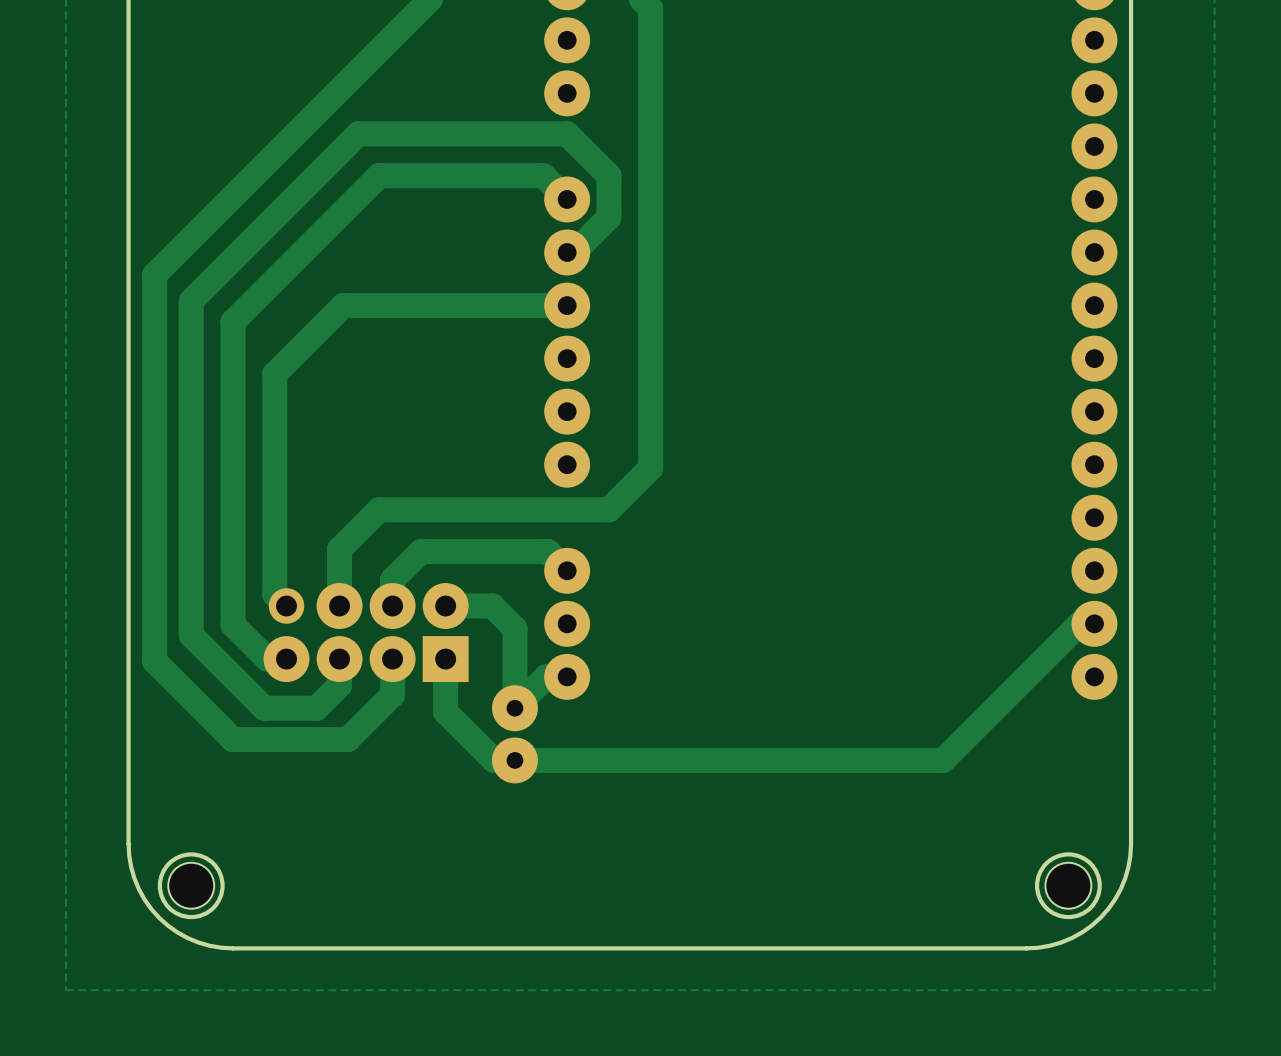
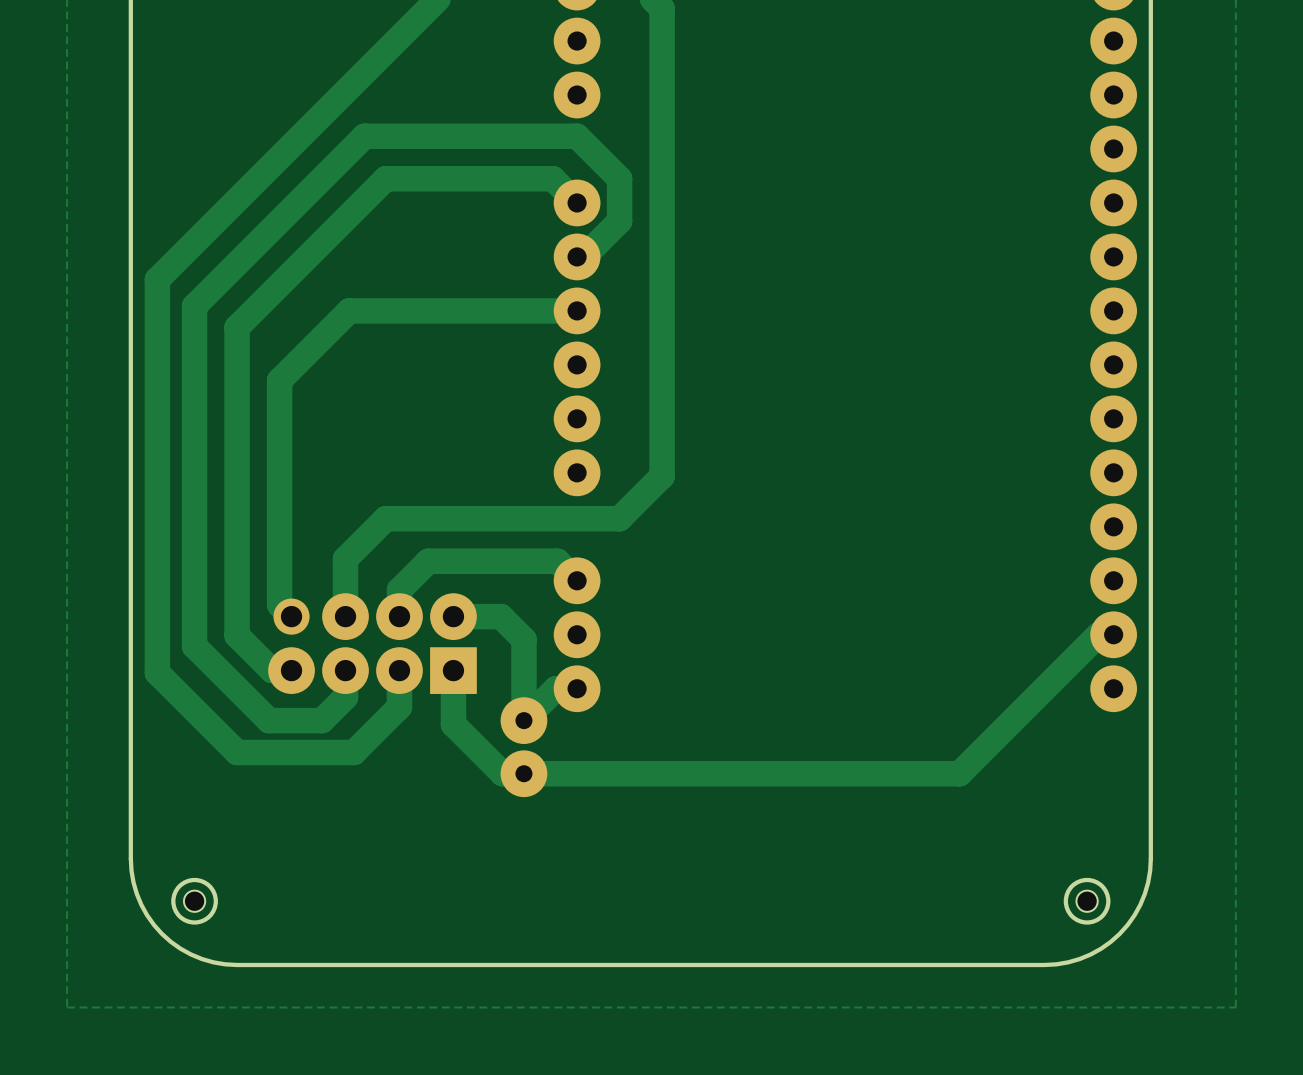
round board edge size: [157, 852, 225, 920] -> [171, 877, 218, 925]
round board edge size: [1034, 852, 1102, 920] -> [1063, 877, 1111, 925]
part footprint: [168, 862, 215, 909] -> [183, 890, 206, 912]
part footprint: [1045, 862, 1092, 909] -> [1076, 890, 1098, 912]

